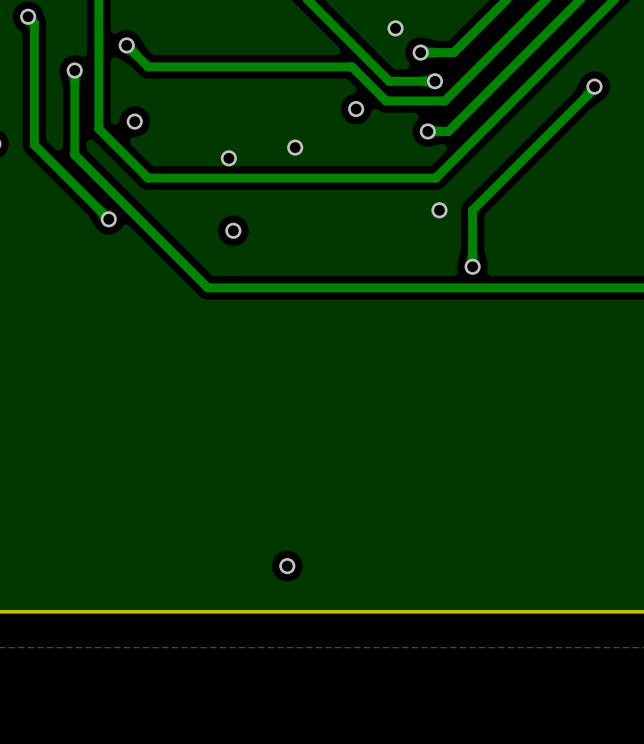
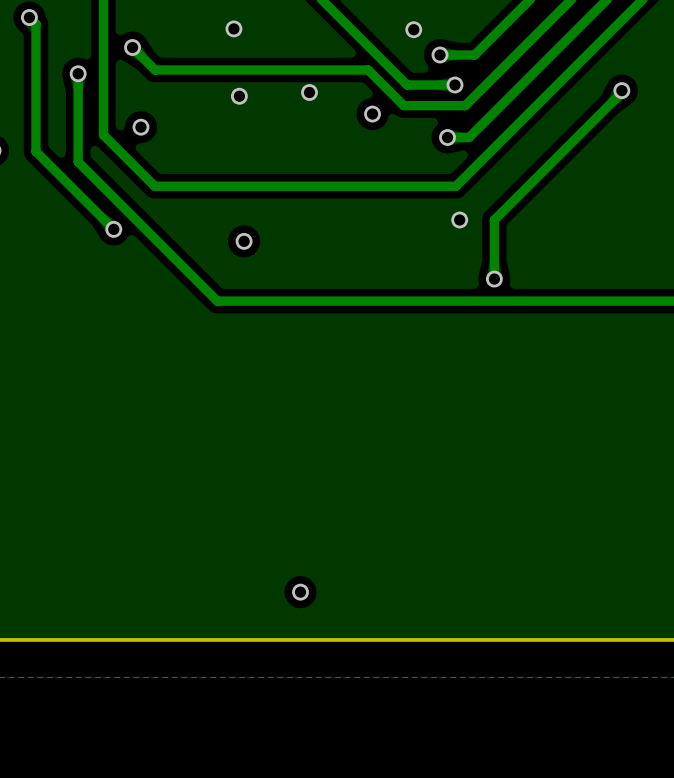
via: none -> (233, 28)
via: none -> (309, 92)
via: none -> (239, 96)
via: (295, 147) -> none
via: (228, 158) -> none

